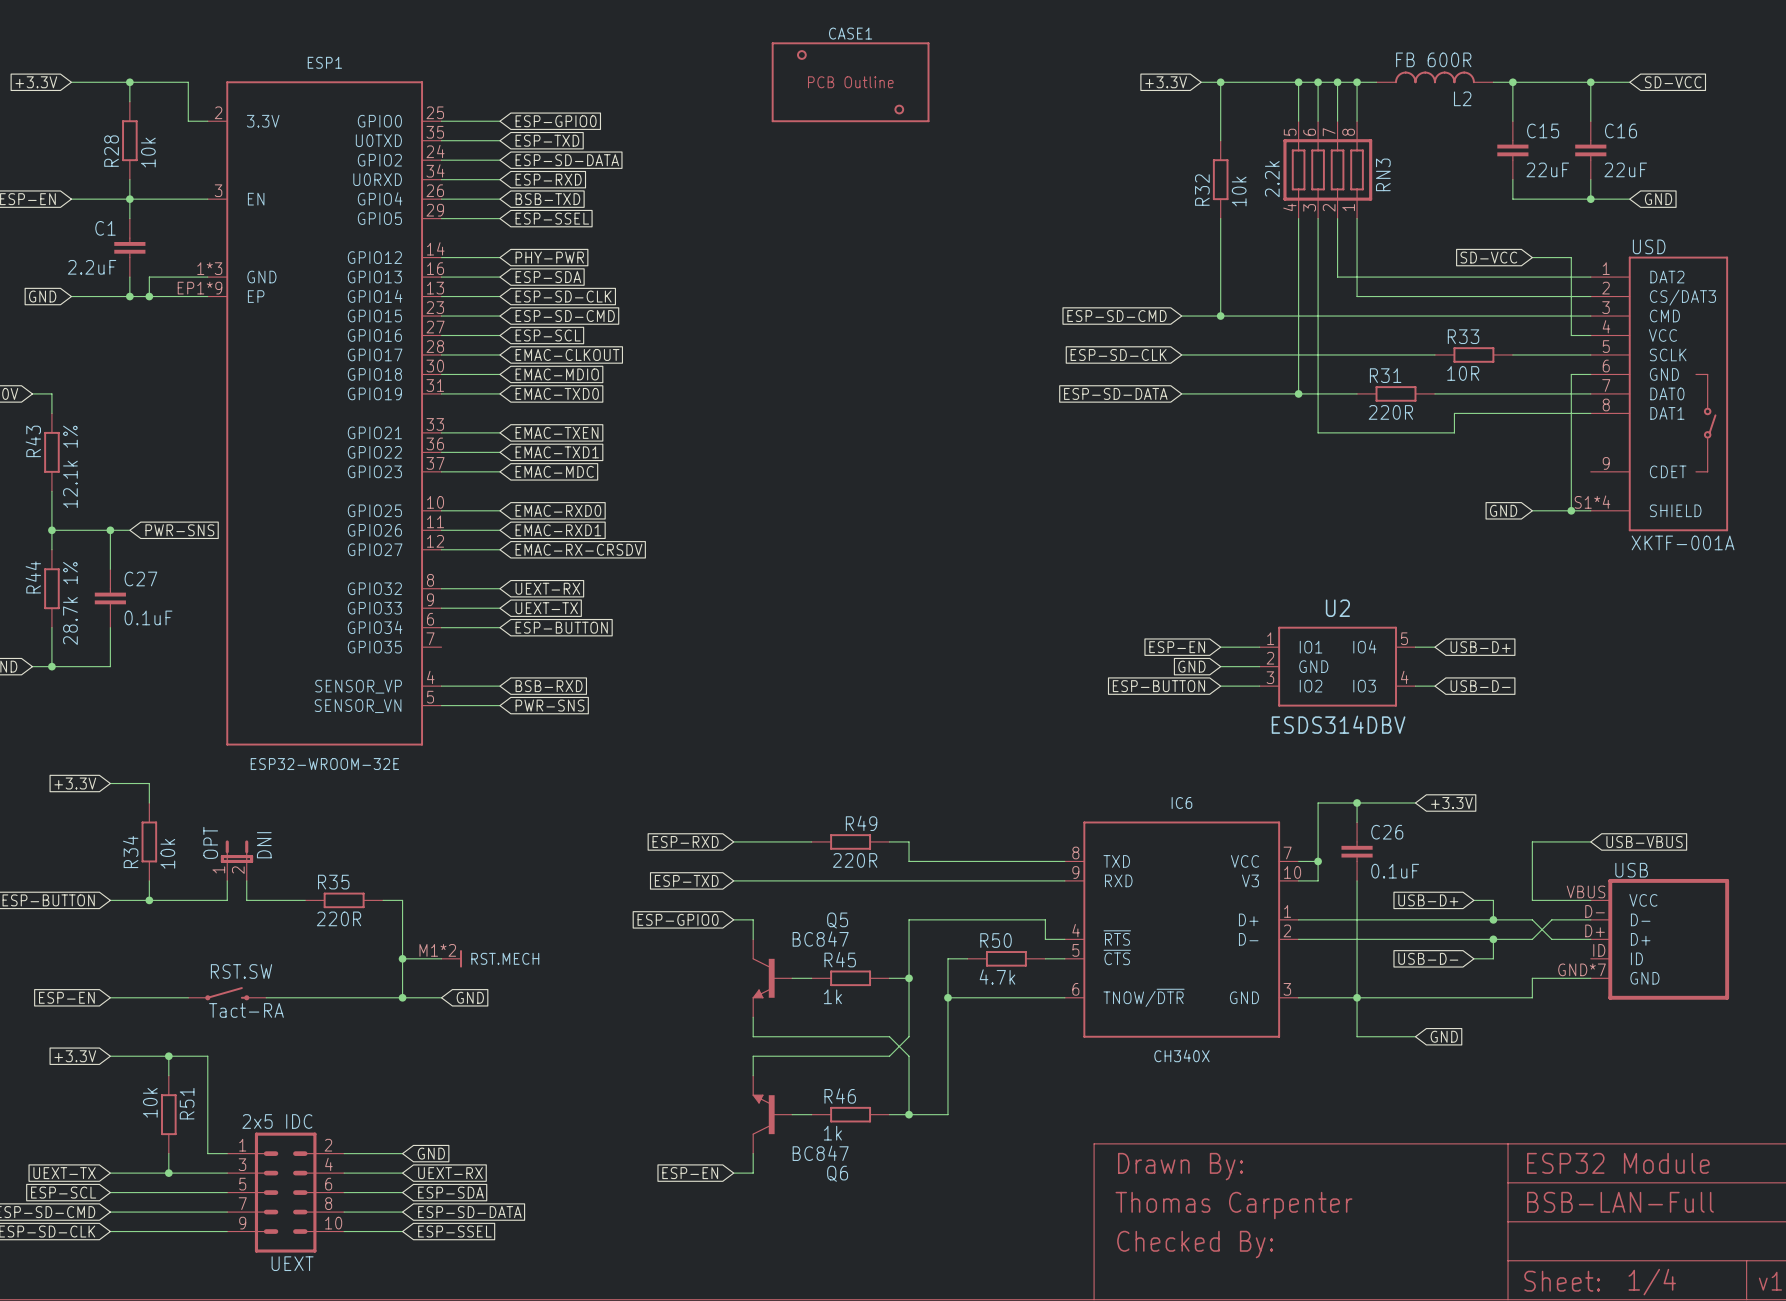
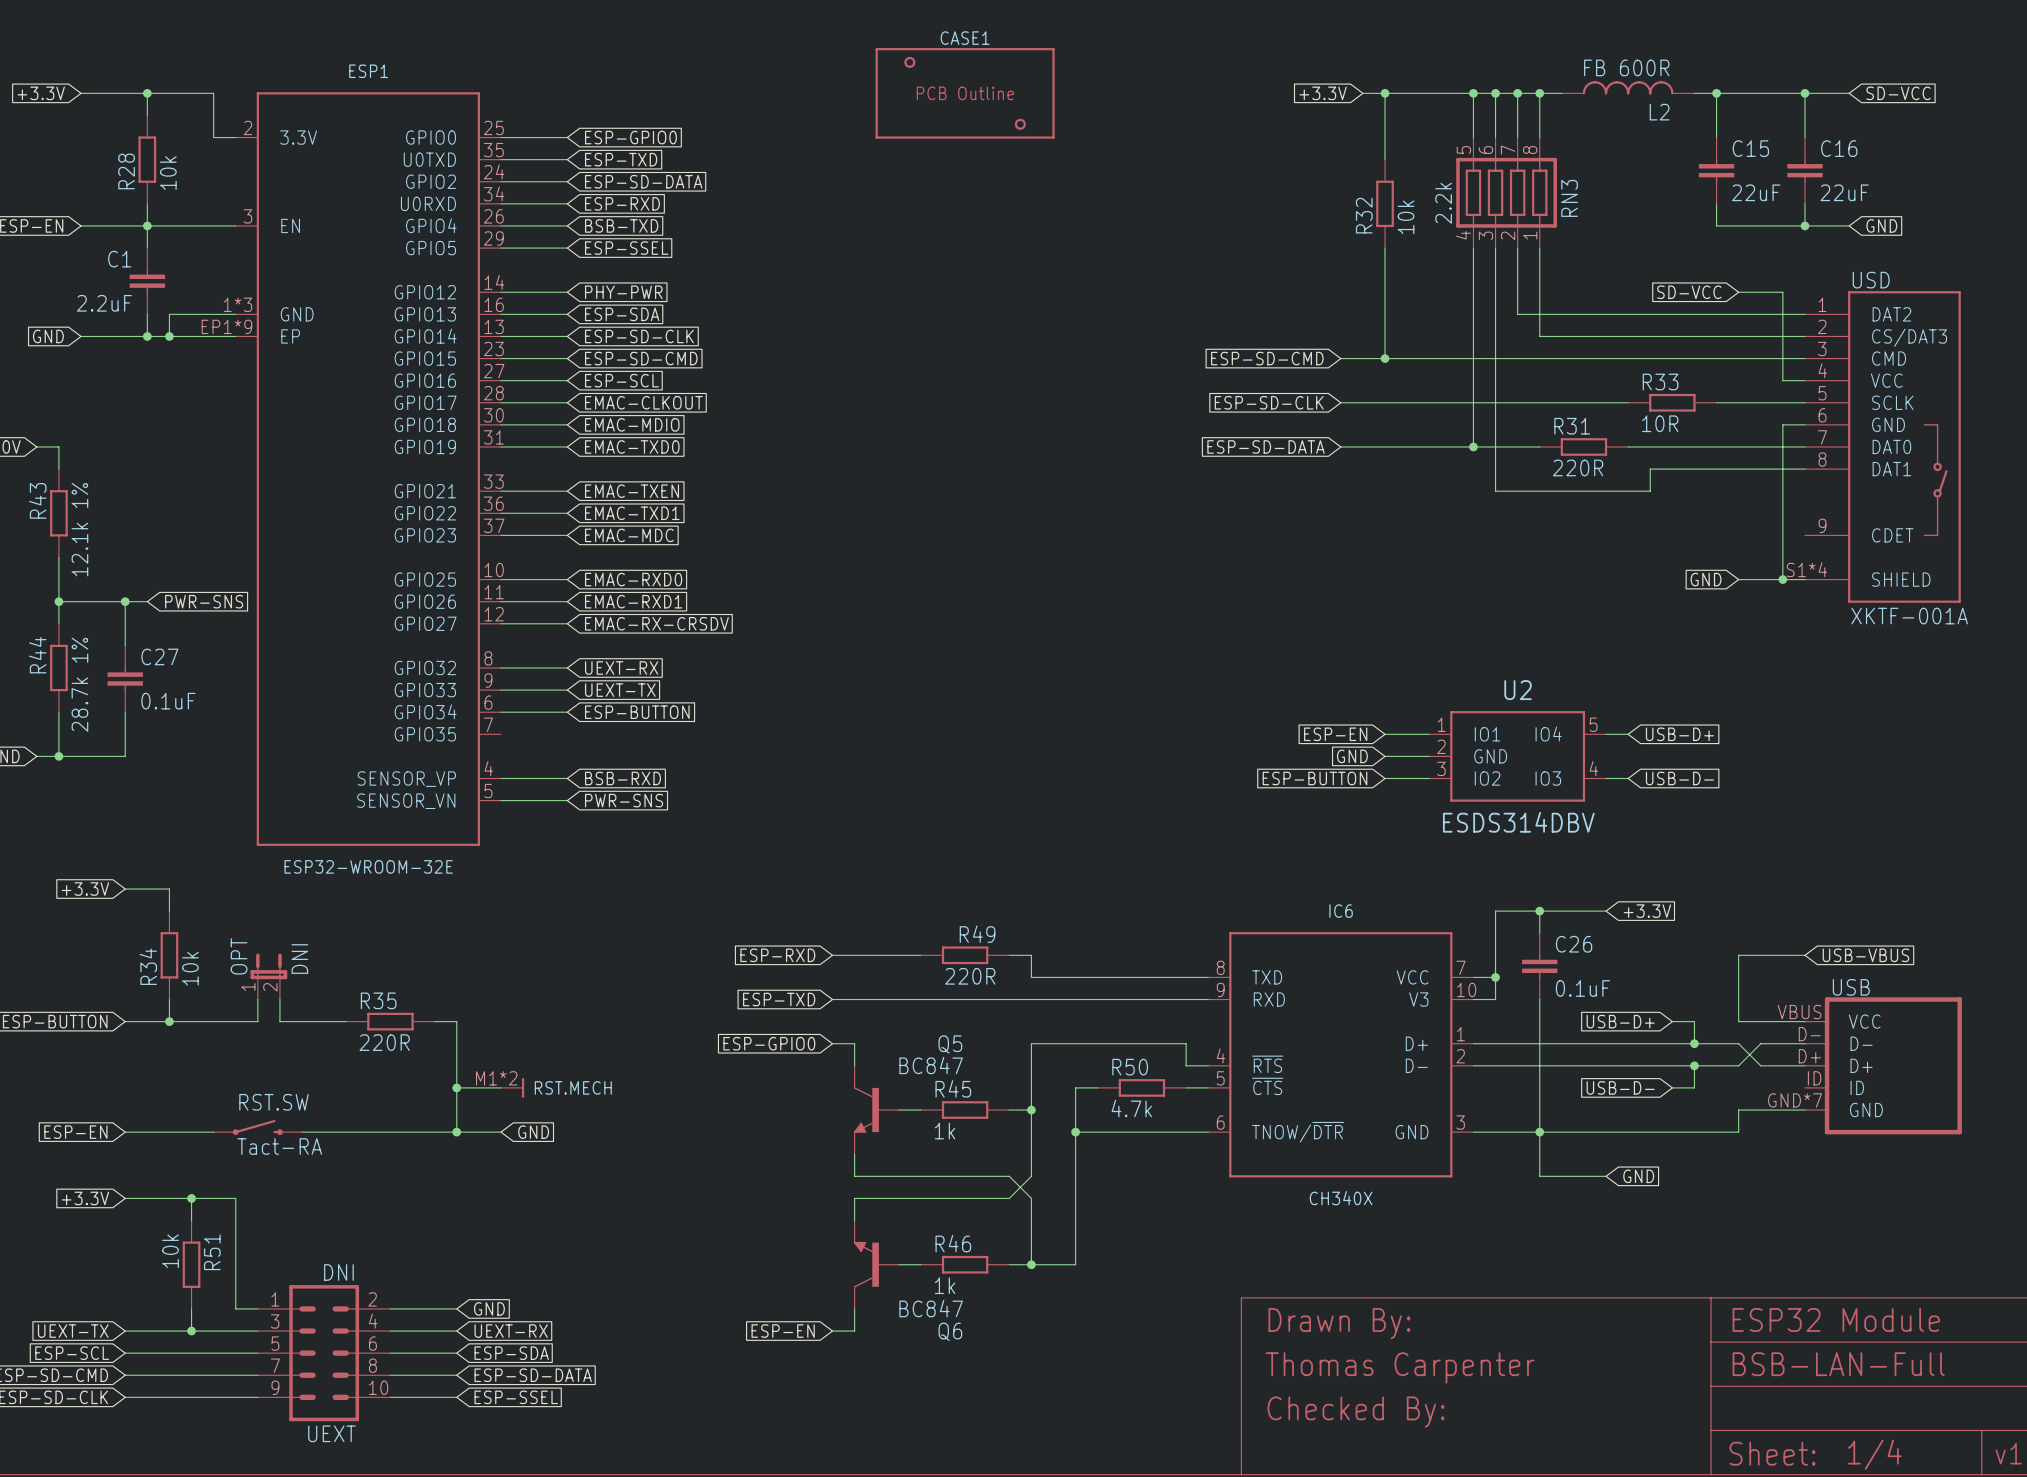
UEXT value: 2x5 IDC (277, 1121) -> DNI (338, 1272)

